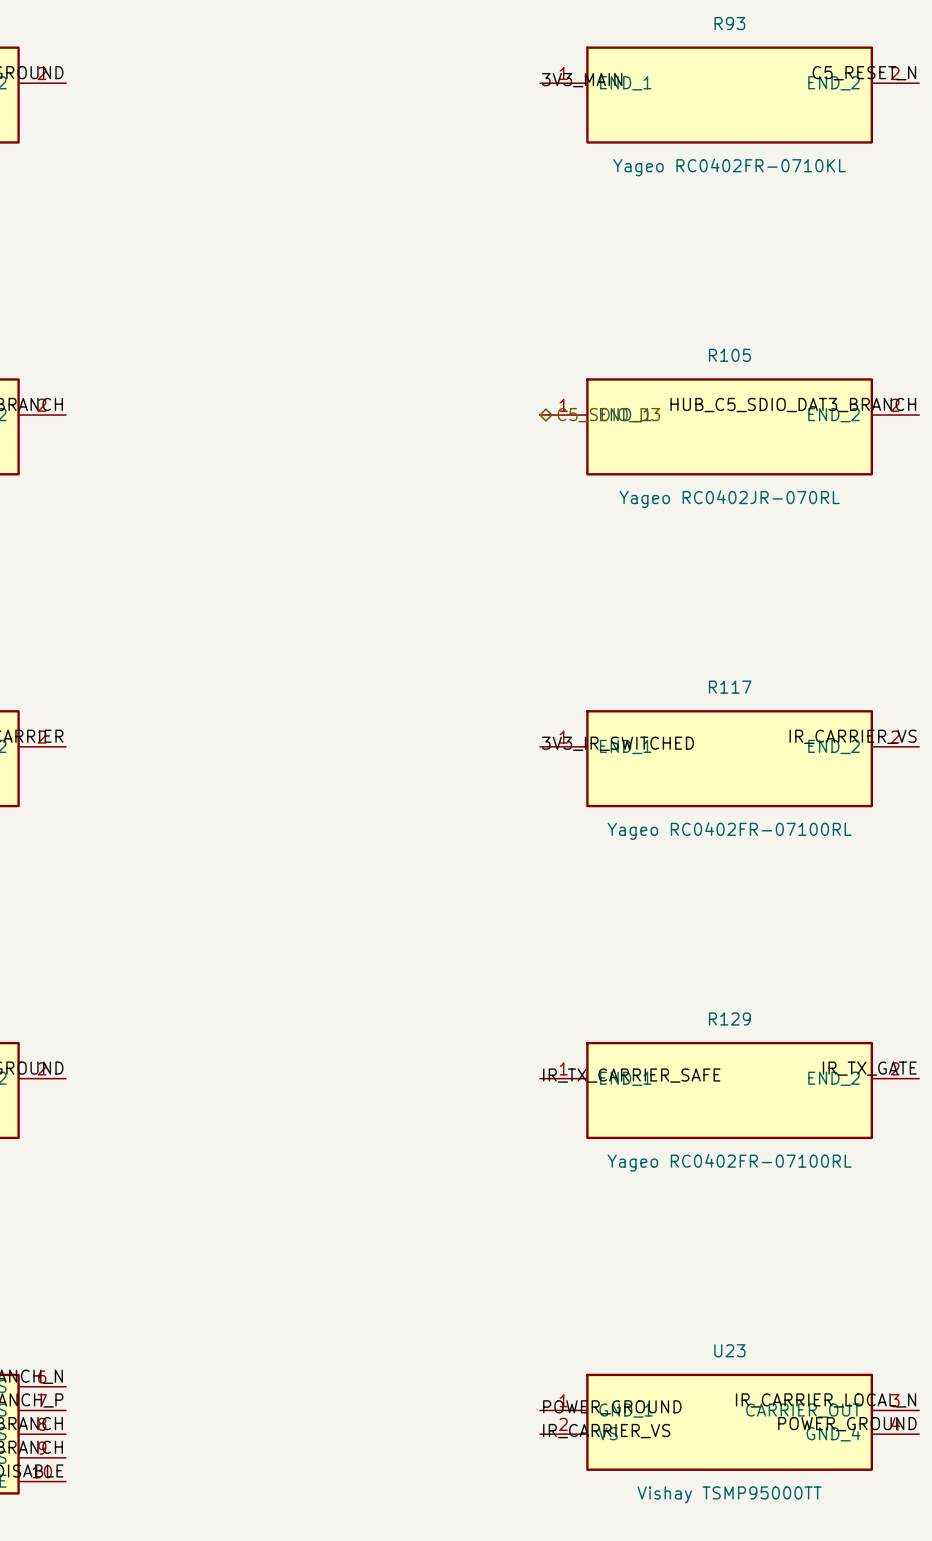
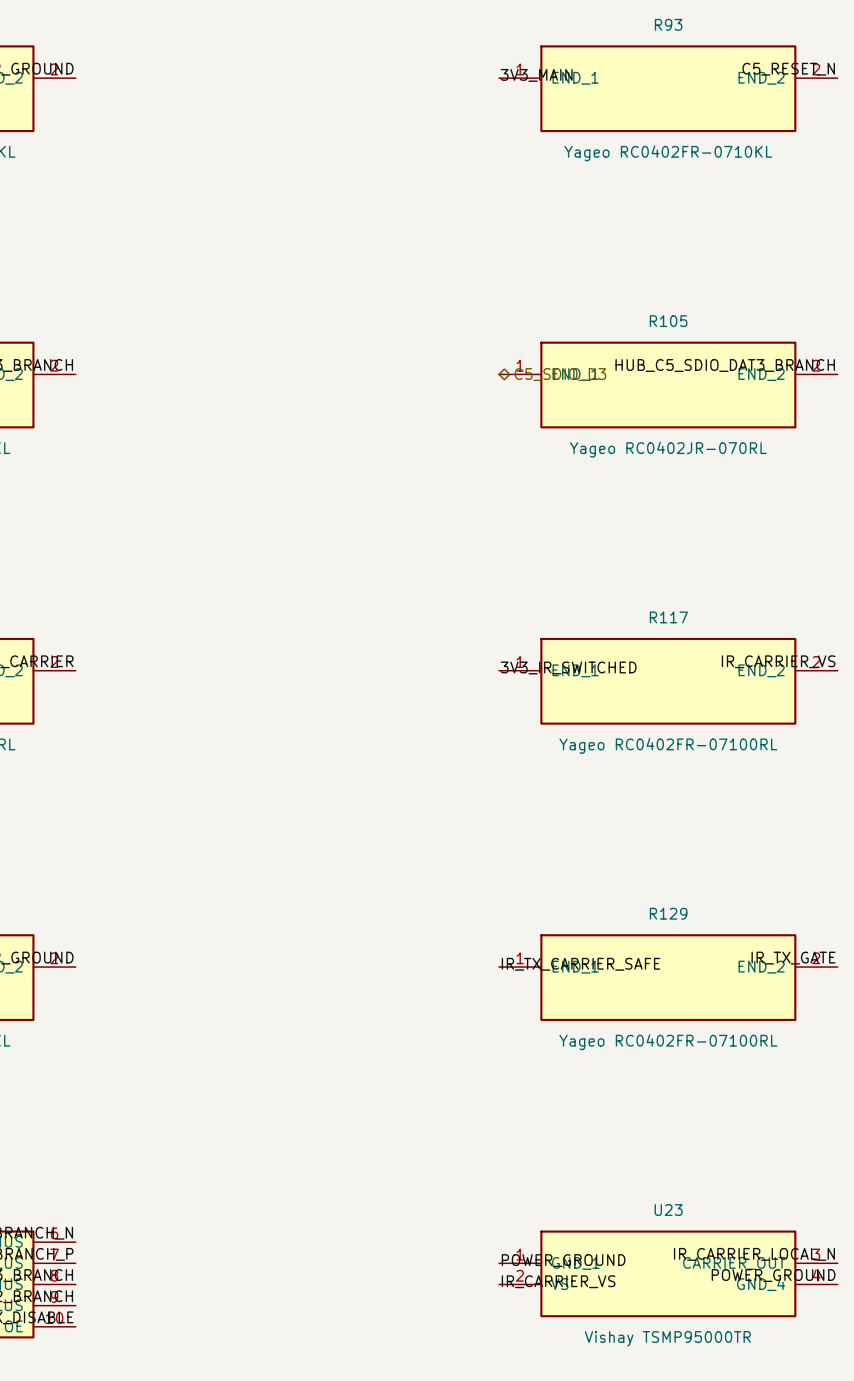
U23 value: Vishay TSMP95000TT (729, 1494) -> Vishay TSMP95000TR (667, 1338)

